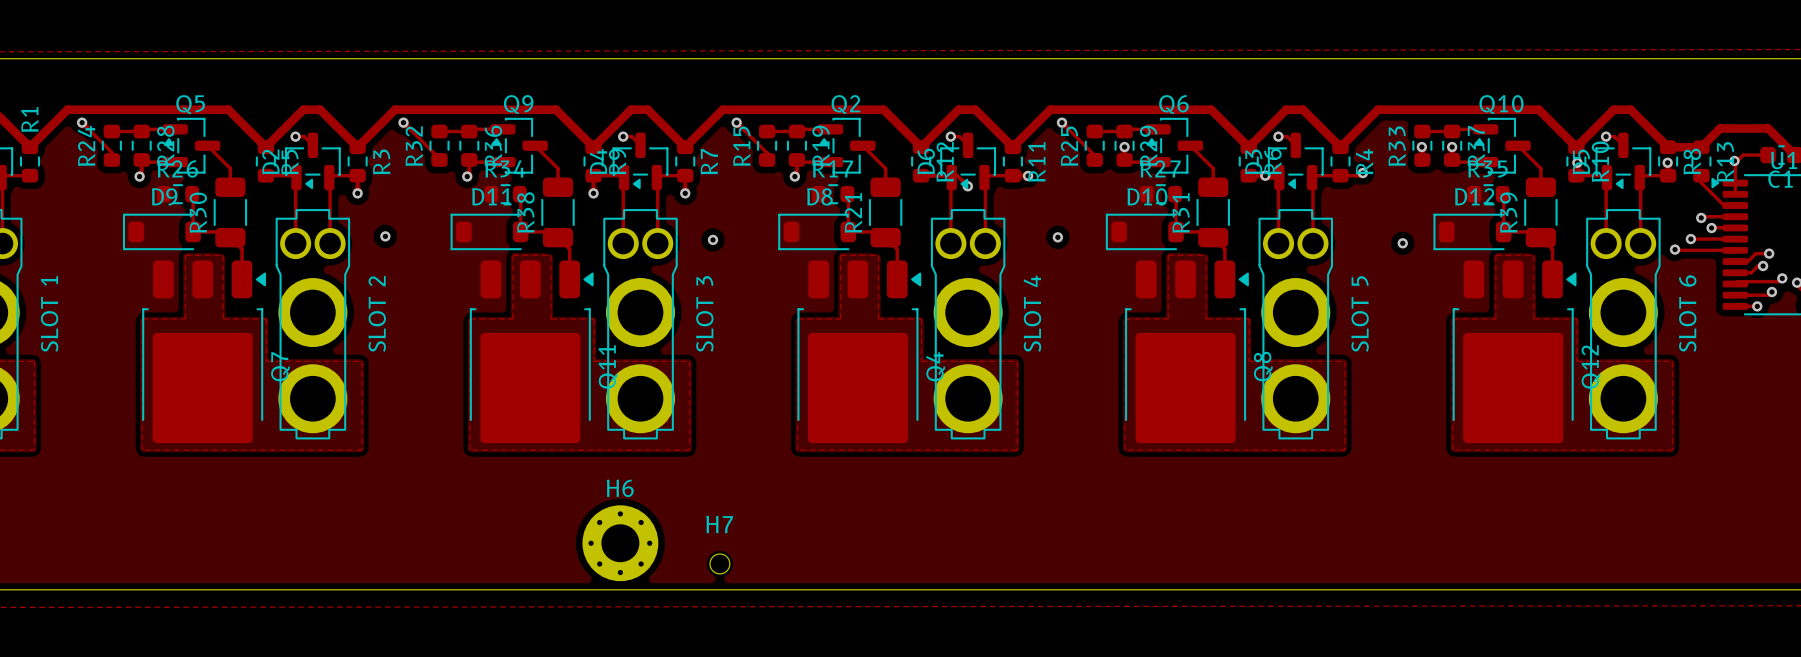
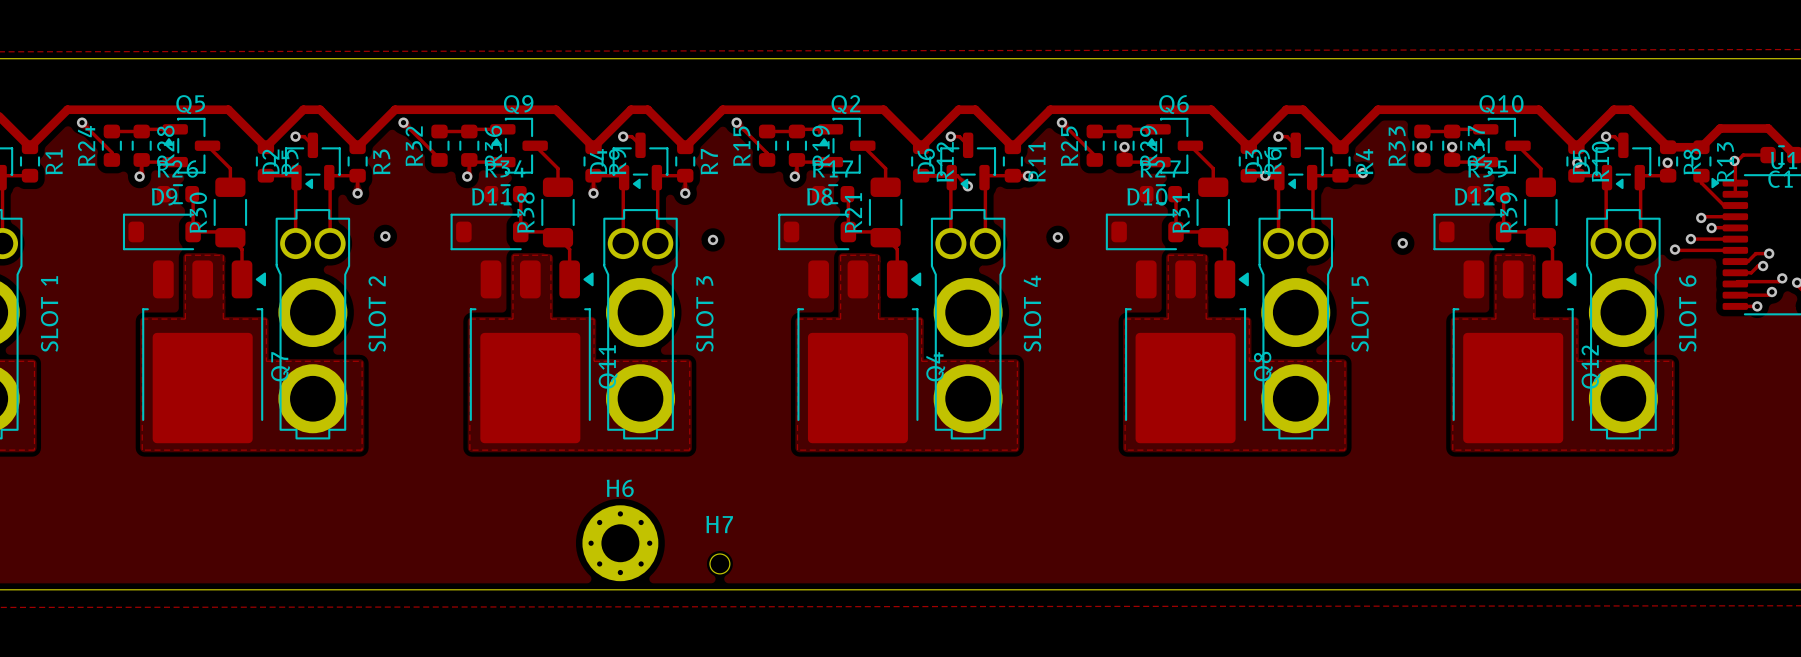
R1 name position: R1 (29, 119) -> R1 (54, 162)

